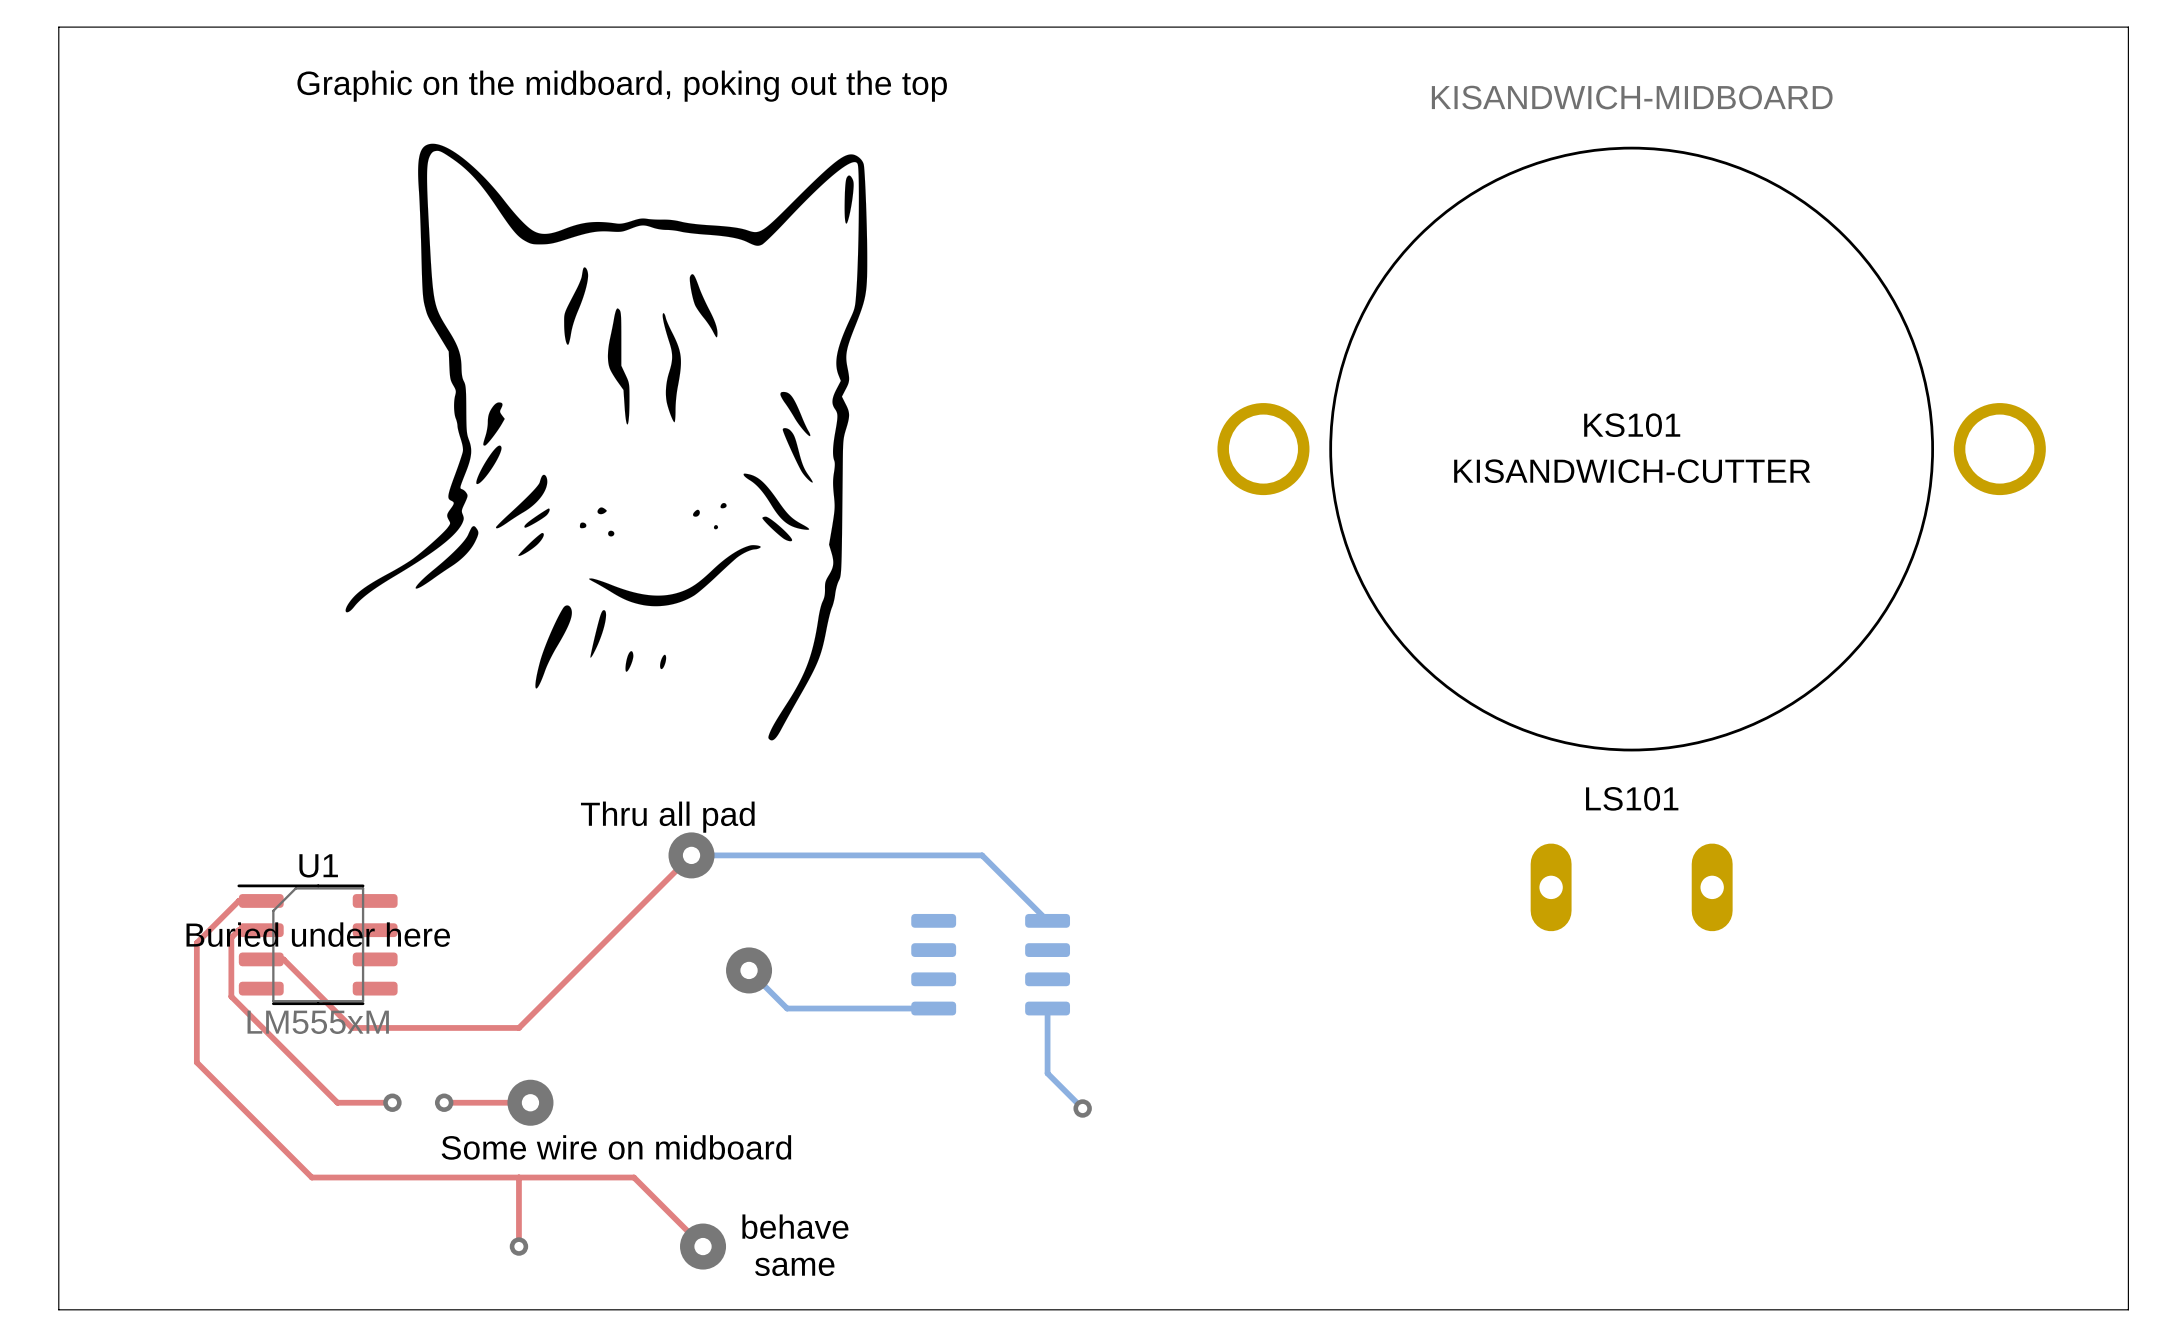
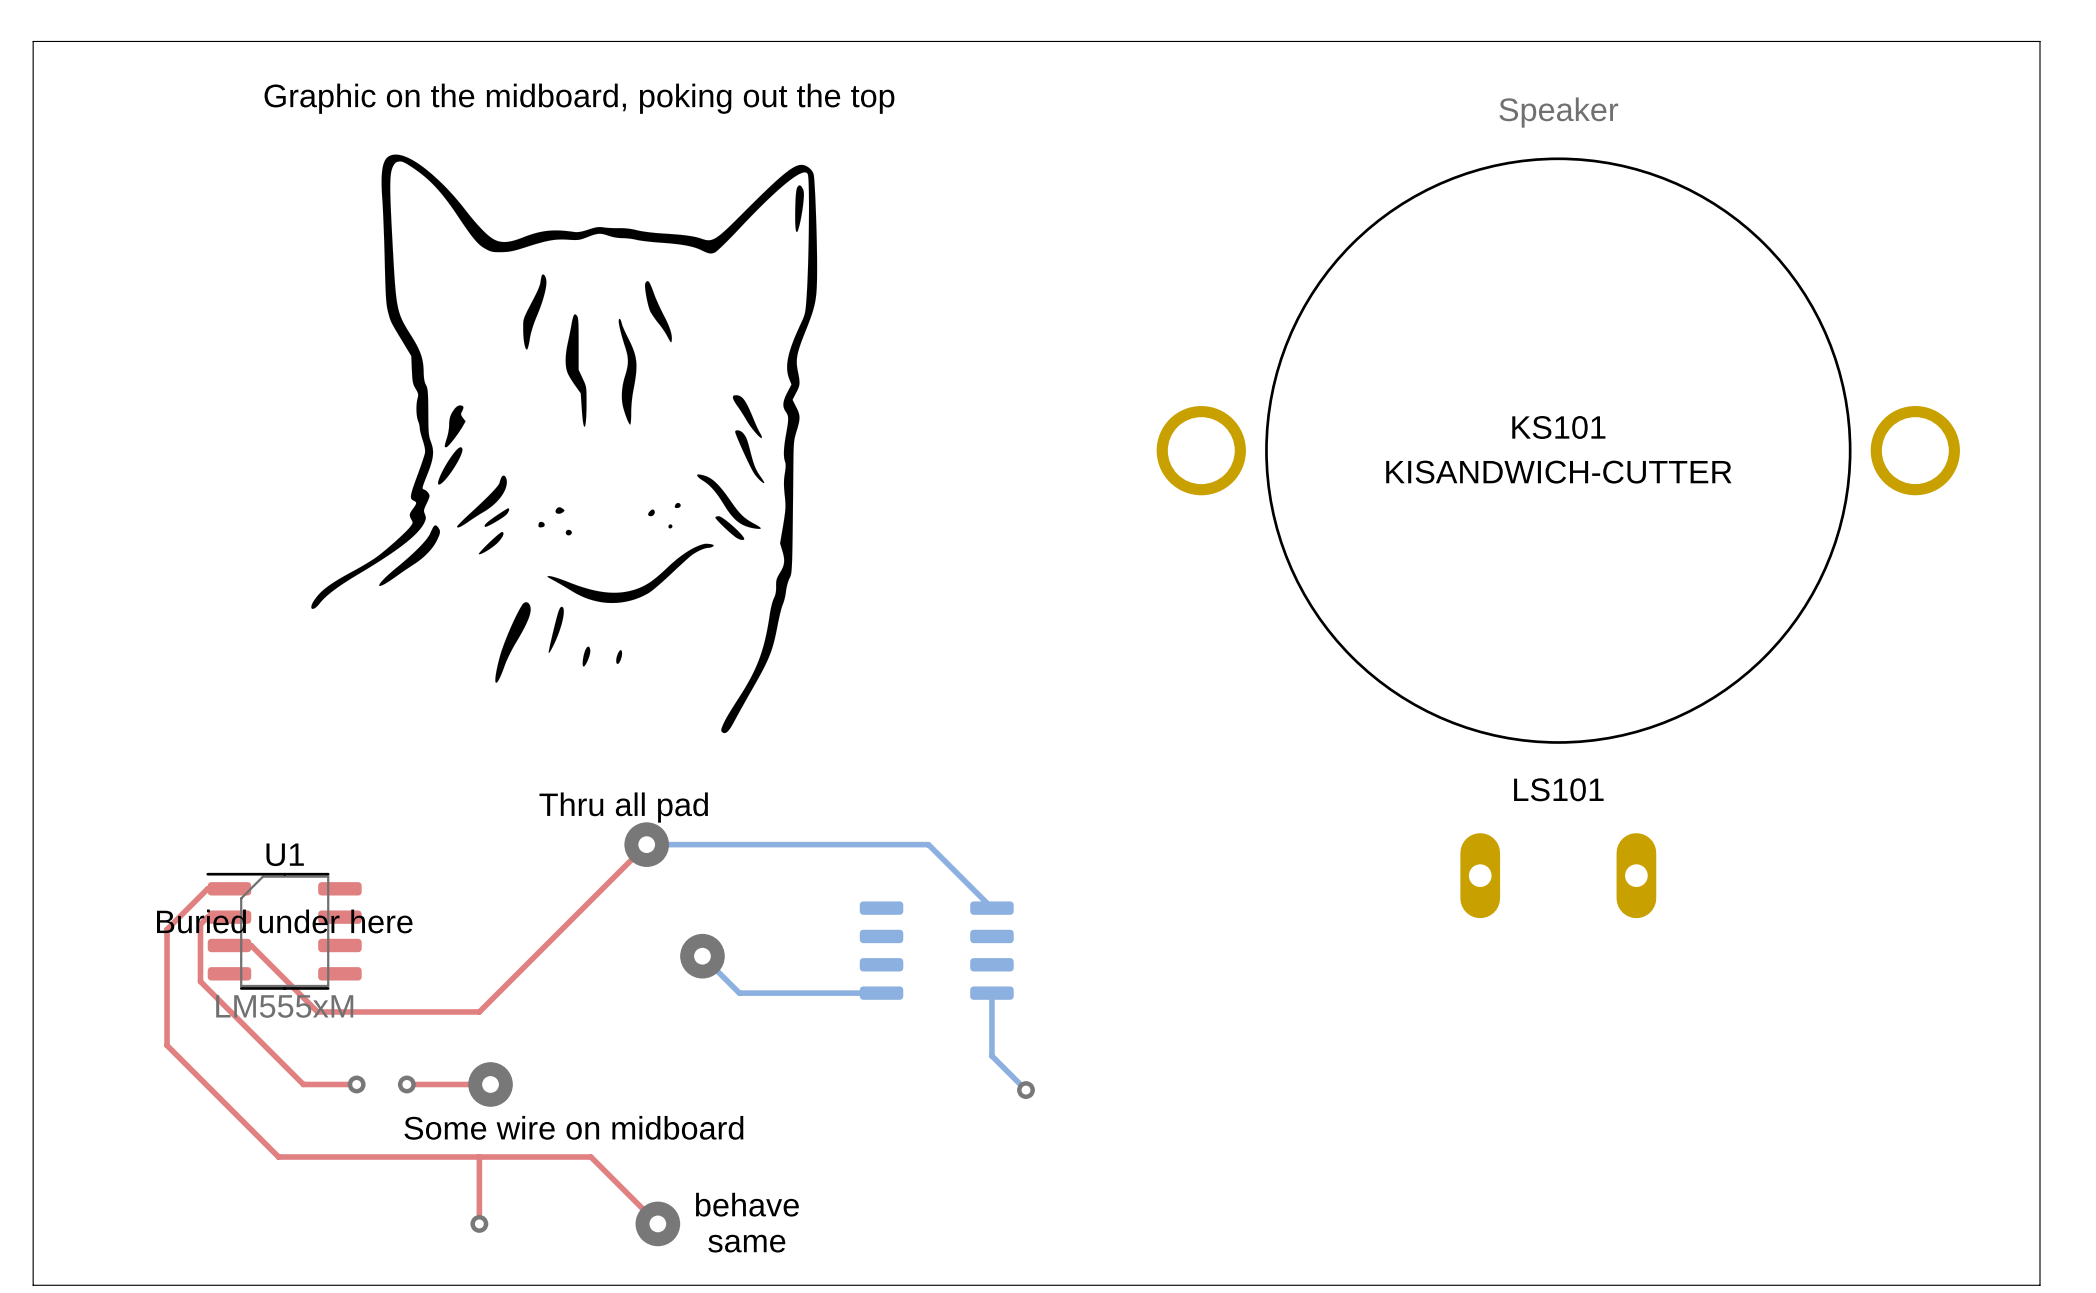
LS101 value: KISANDWICH-MIDBOARD (1632, 97) -> Speaker (1558, 112)

